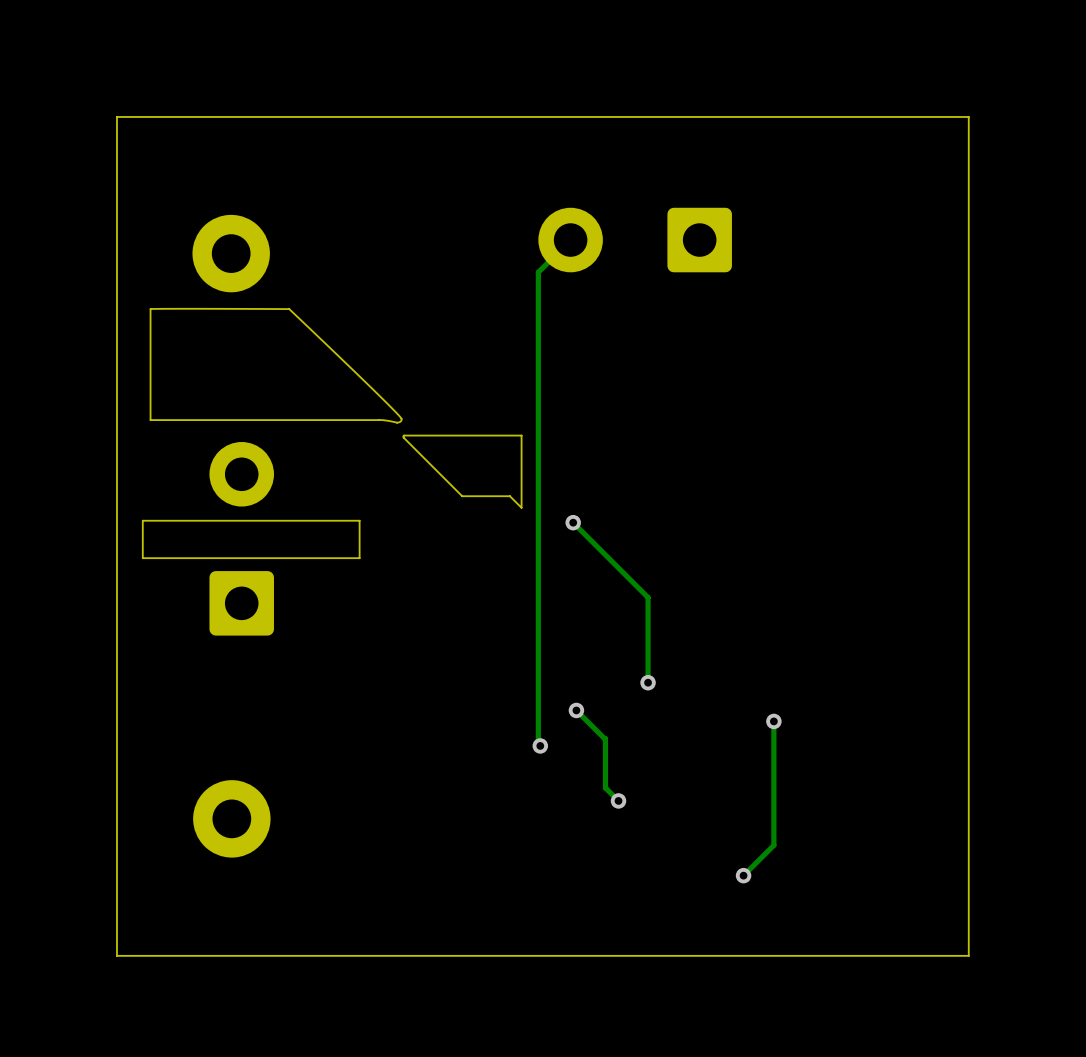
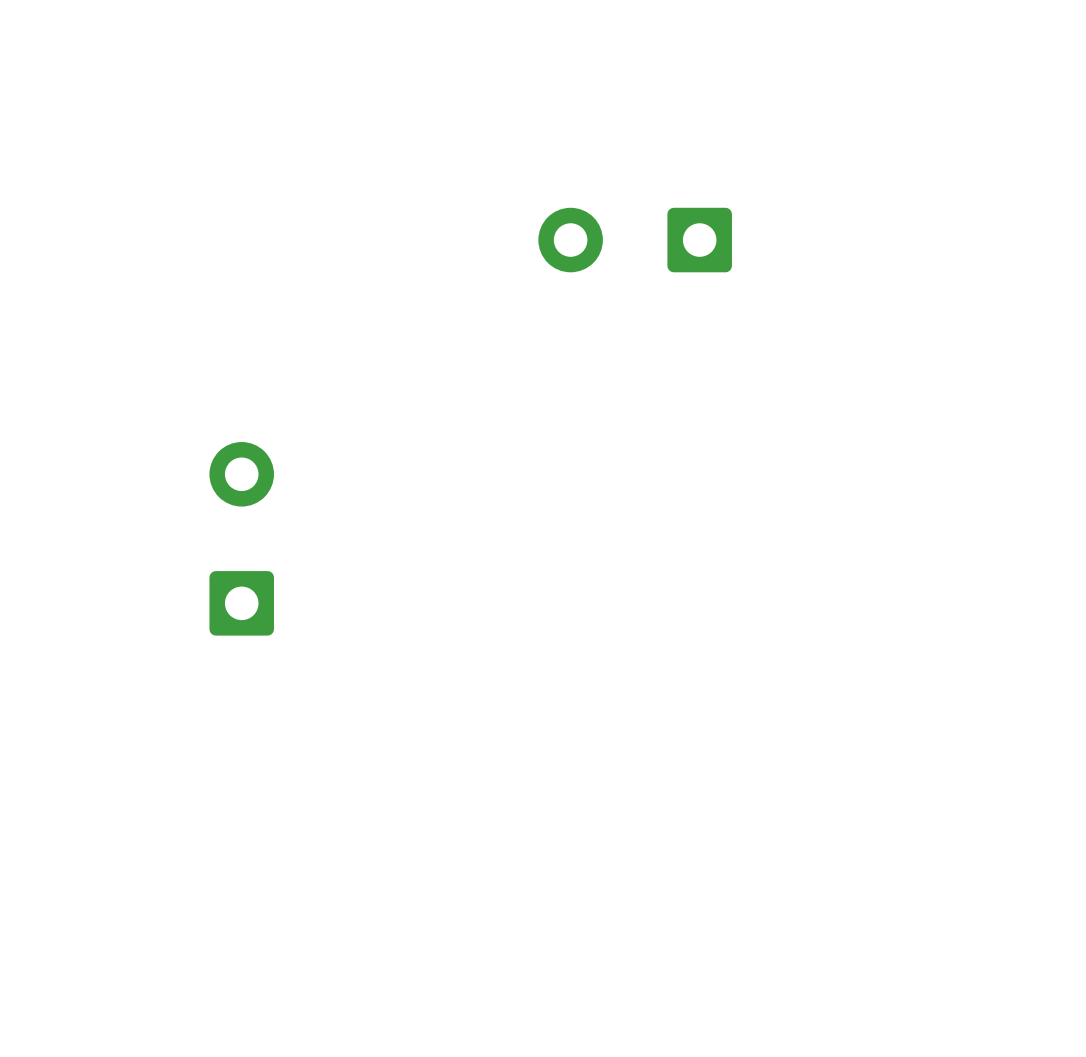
board edge: (968, 116) (116, 116) (116, 955) (968, 955) (968, 116) -> none
track: (570, 240) (538, 272) (538, 744) (540, 745) -> none
part: (231, 253) -> none
board edge: (289, 309) (390, 407) (401, 418) (400, 421) (150, 420) (150, 309) (289, 309) -> none
board edge: (521, 435) (521, 507) (509, 496) (462, 496) (403, 436) (521, 435) -> none
board edge: (359, 520) (142, 520) (142, 558) (359, 558) (359, 520) -> none
track: (573, 522) (648, 597) (648, 682) -> none
via: (573, 522) -> none
via: (648, 682) -> none
track: (576, 710) (605, 738) (605, 787) (618, 800) -> none
via: (576, 710) -> none
track: (773, 721) (773, 845) (743, 875) -> none
via: (773, 721) -> none
via: (540, 745) -> none
via: (618, 800) -> none
part: (231, 818) -> none
via: (743, 875) -> none

